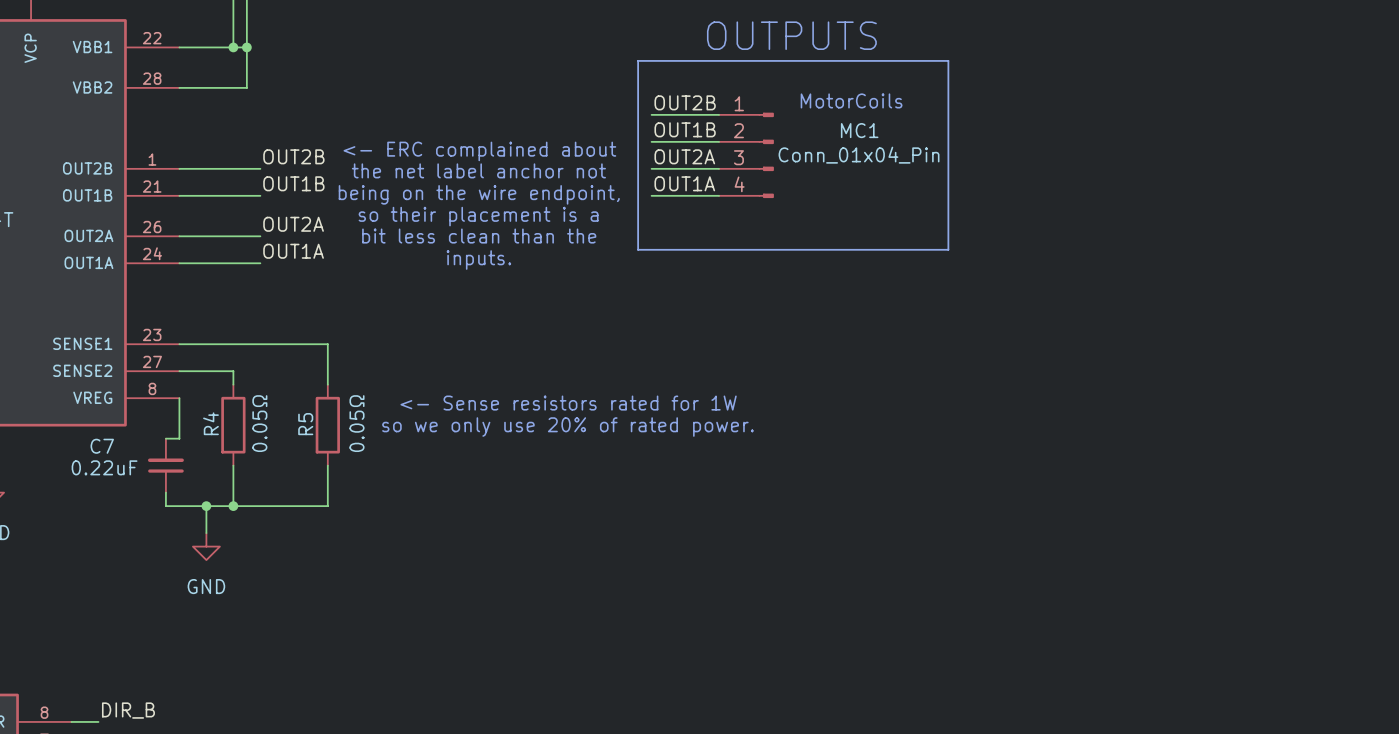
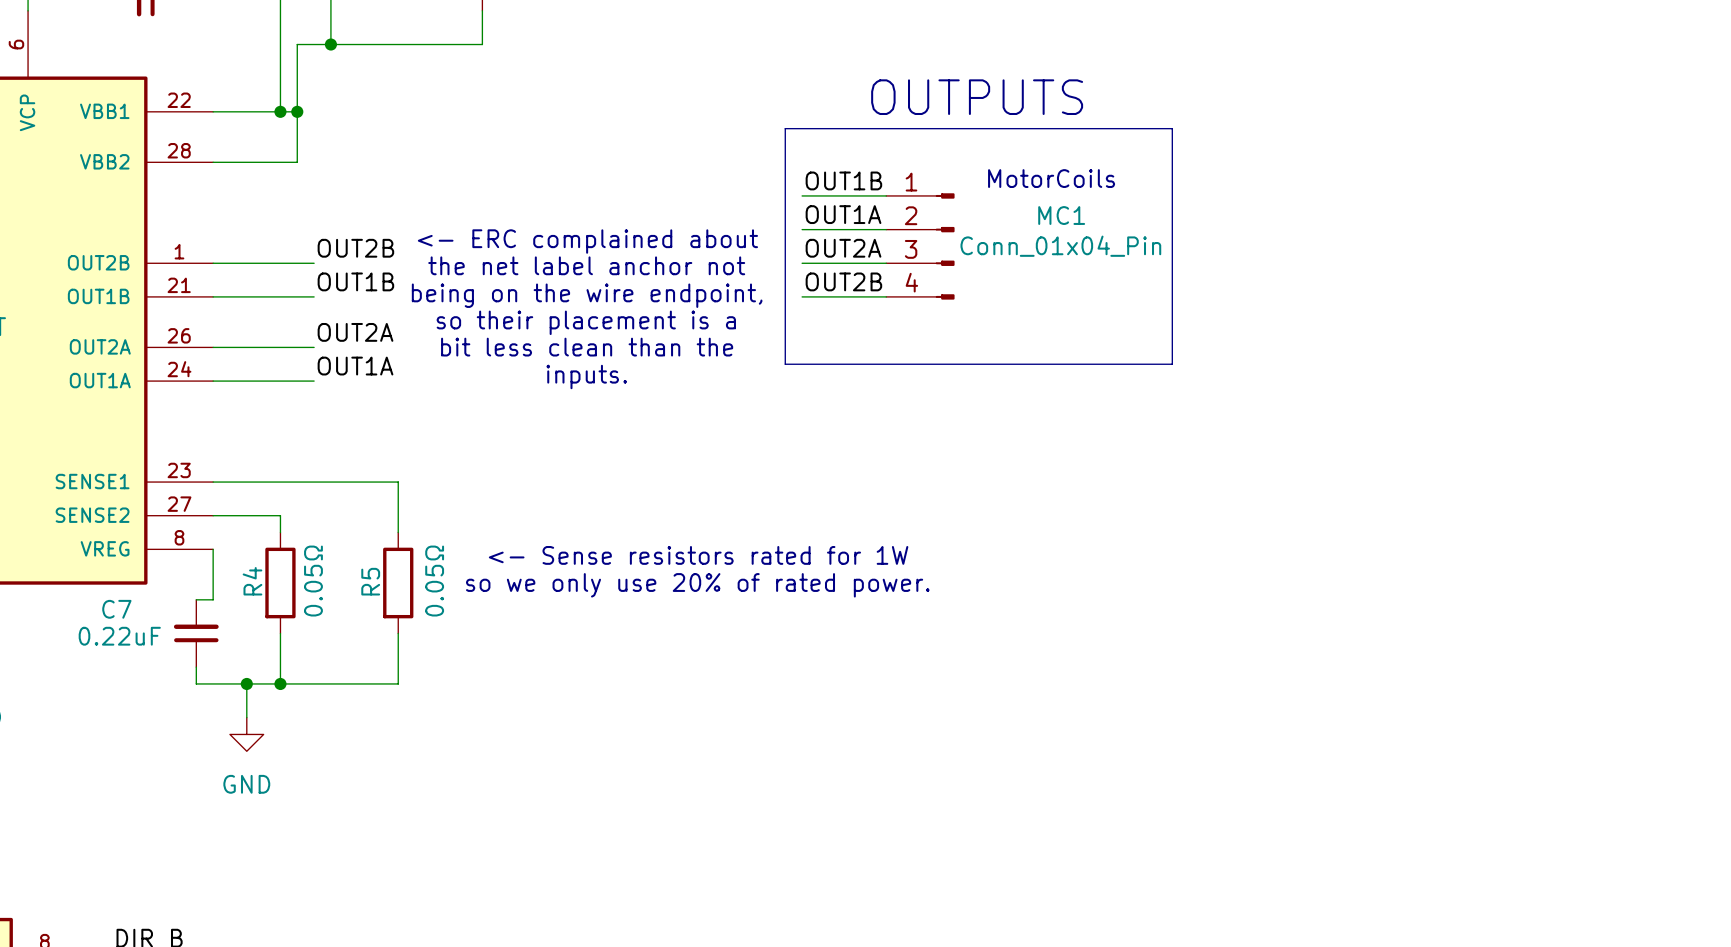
label: OUT2B (685, 102) -> OUT1B (843, 180)
label: OUT1B (685, 129) -> OUT1A (843, 214)
label: OUT1A (684, 183) -> OUT2B (843, 281)

